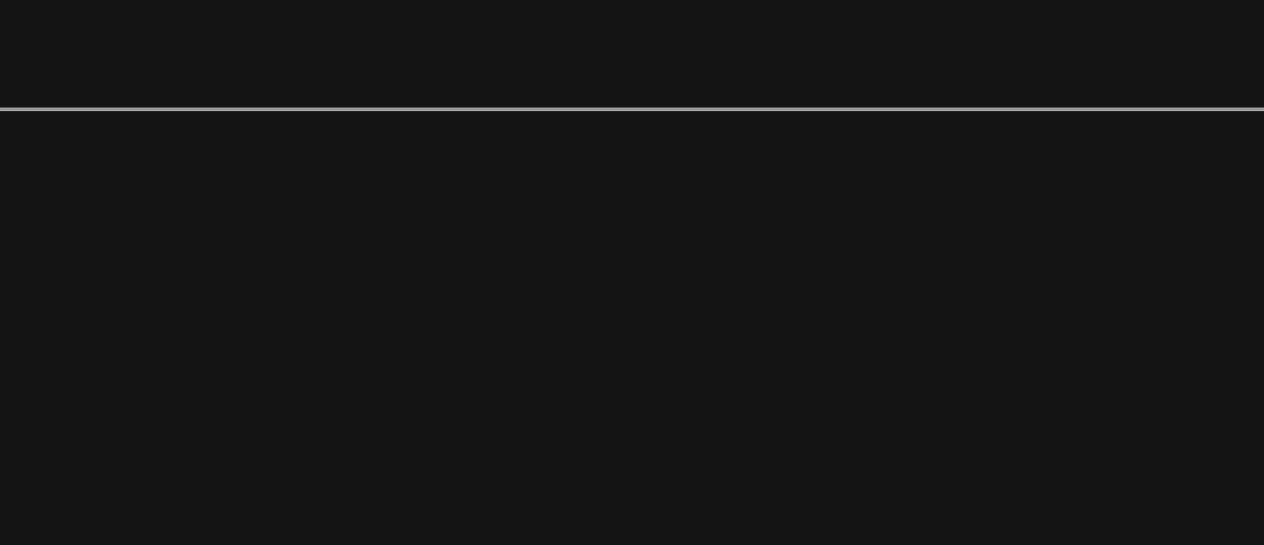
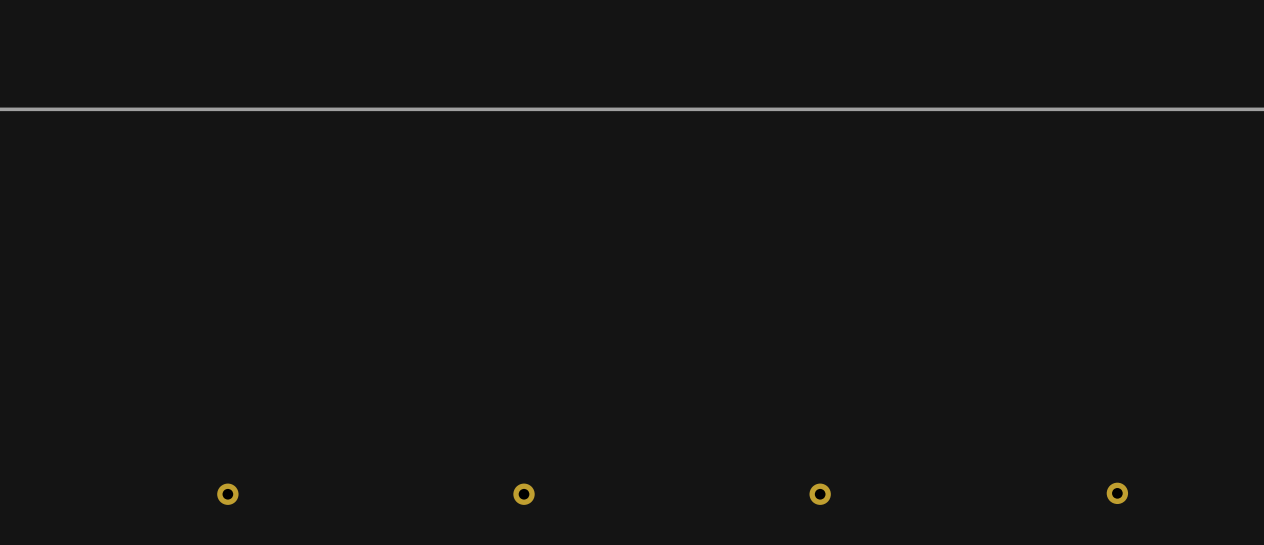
via: none -> (1117, 493)
via: none -> (227, 494)
via: none -> (524, 494)
via: none -> (820, 494)

